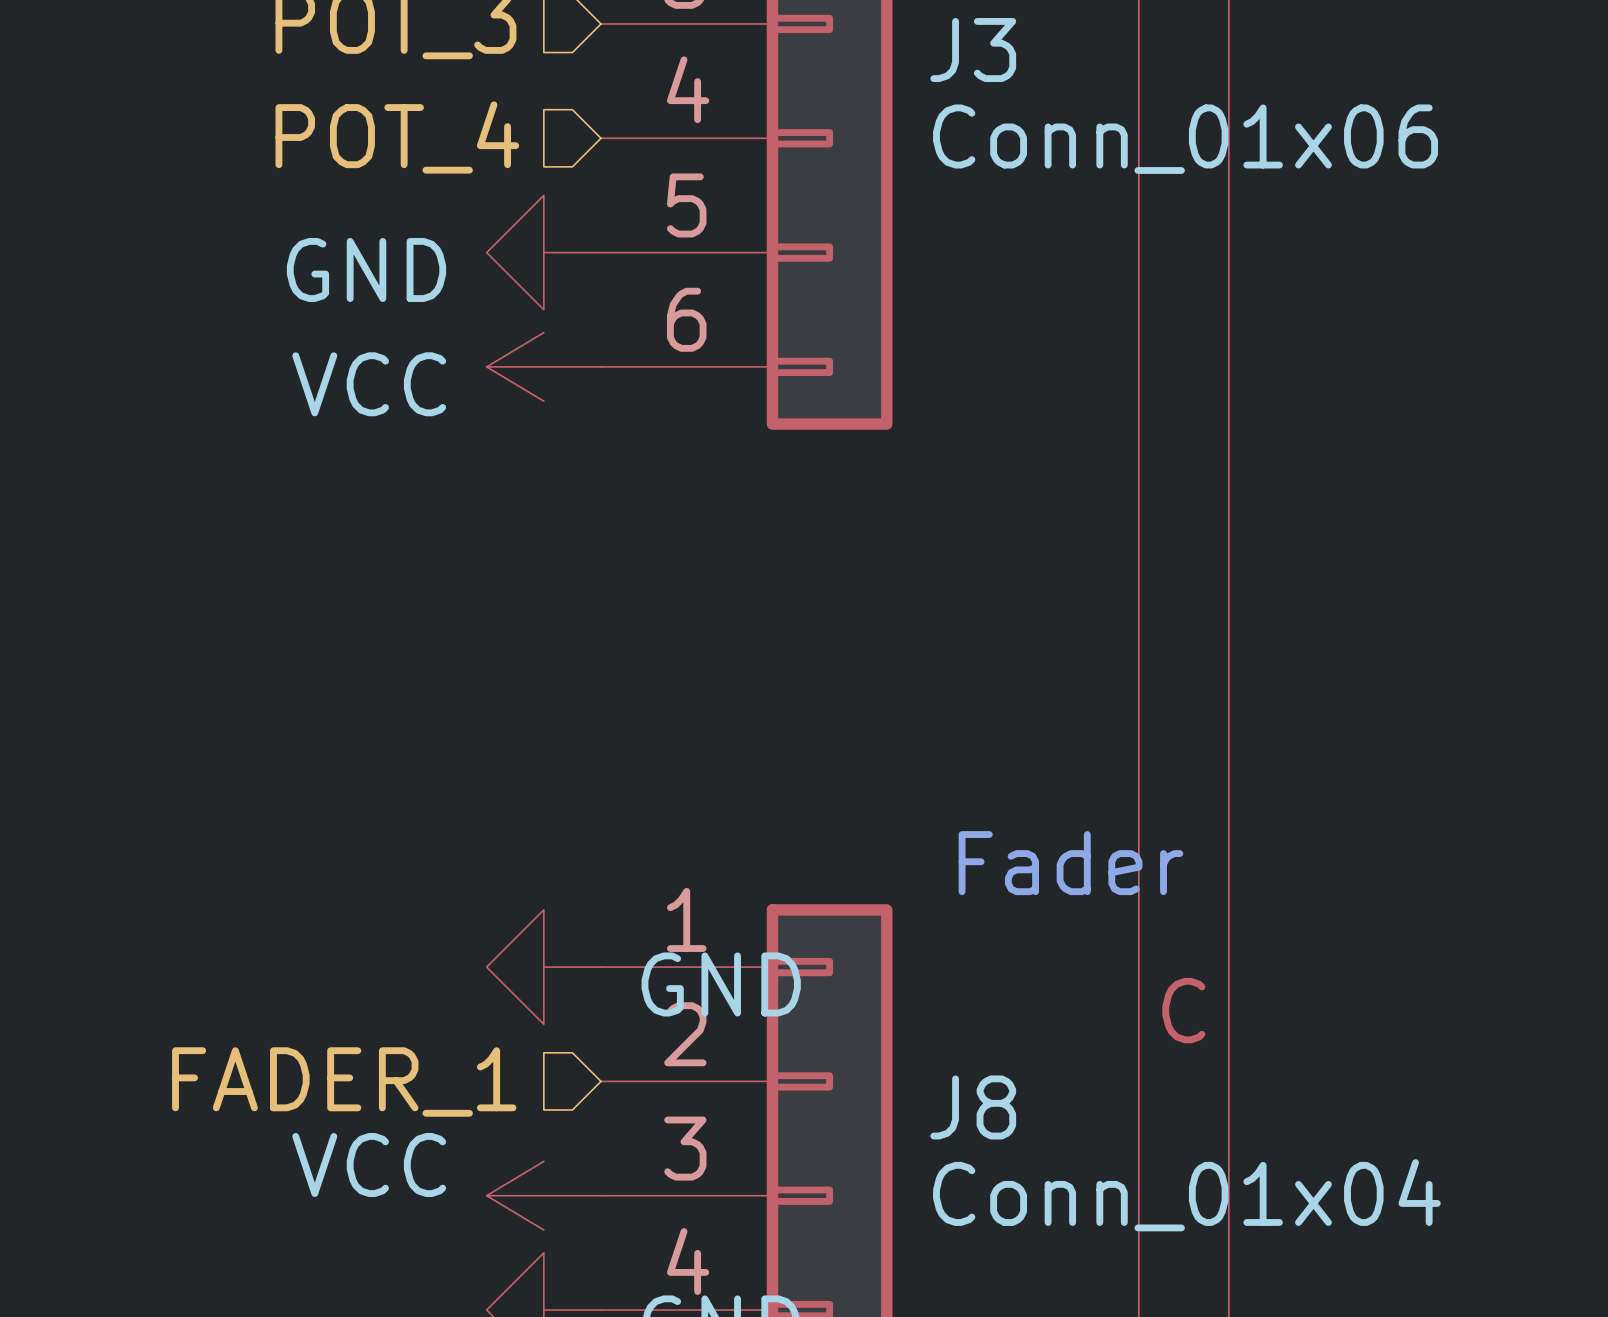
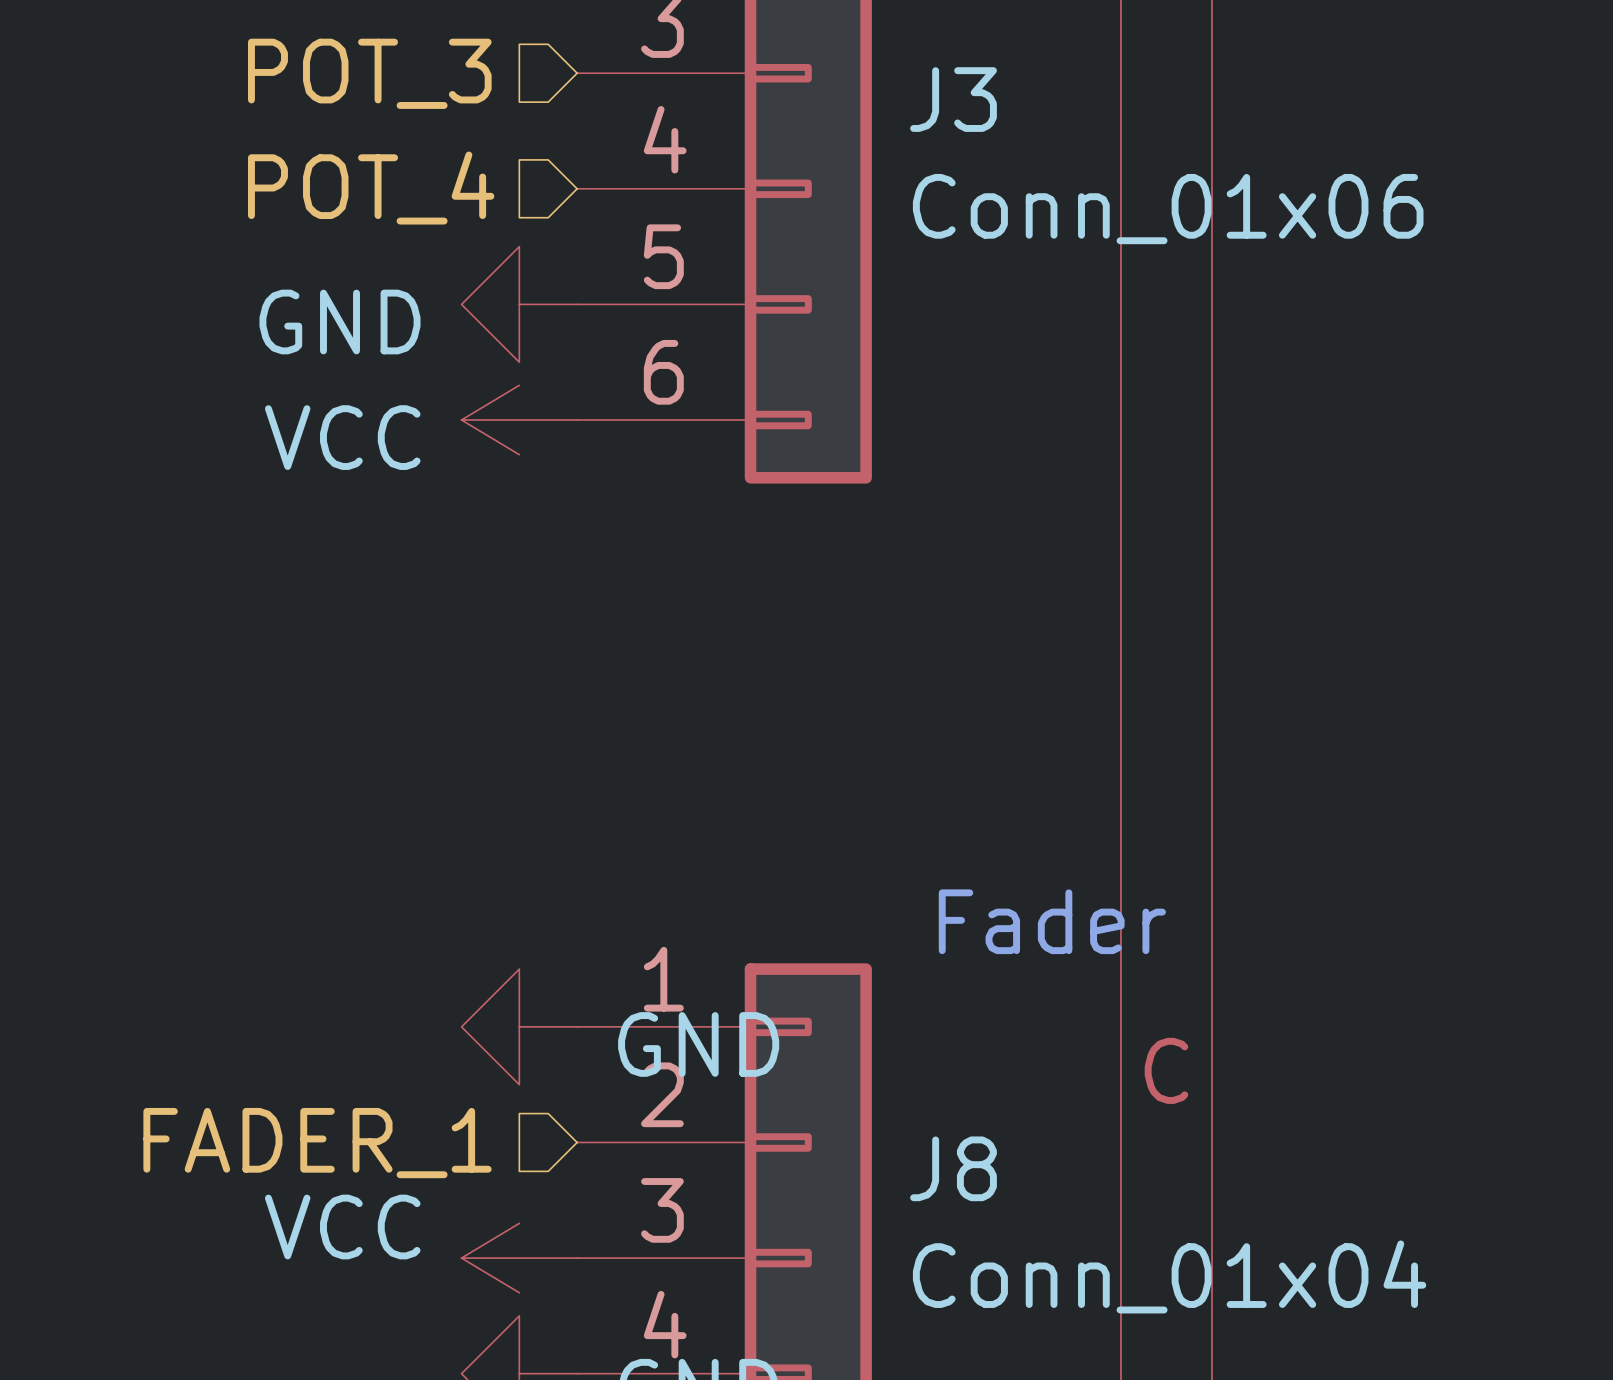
J3 value position: Conn_01x06 (1185, 139) -> Conn_01x06 (1168, 209)
J8 value position: Conn_01x04 (1186, 1195) -> Conn_01x04 (1169, 1276)

